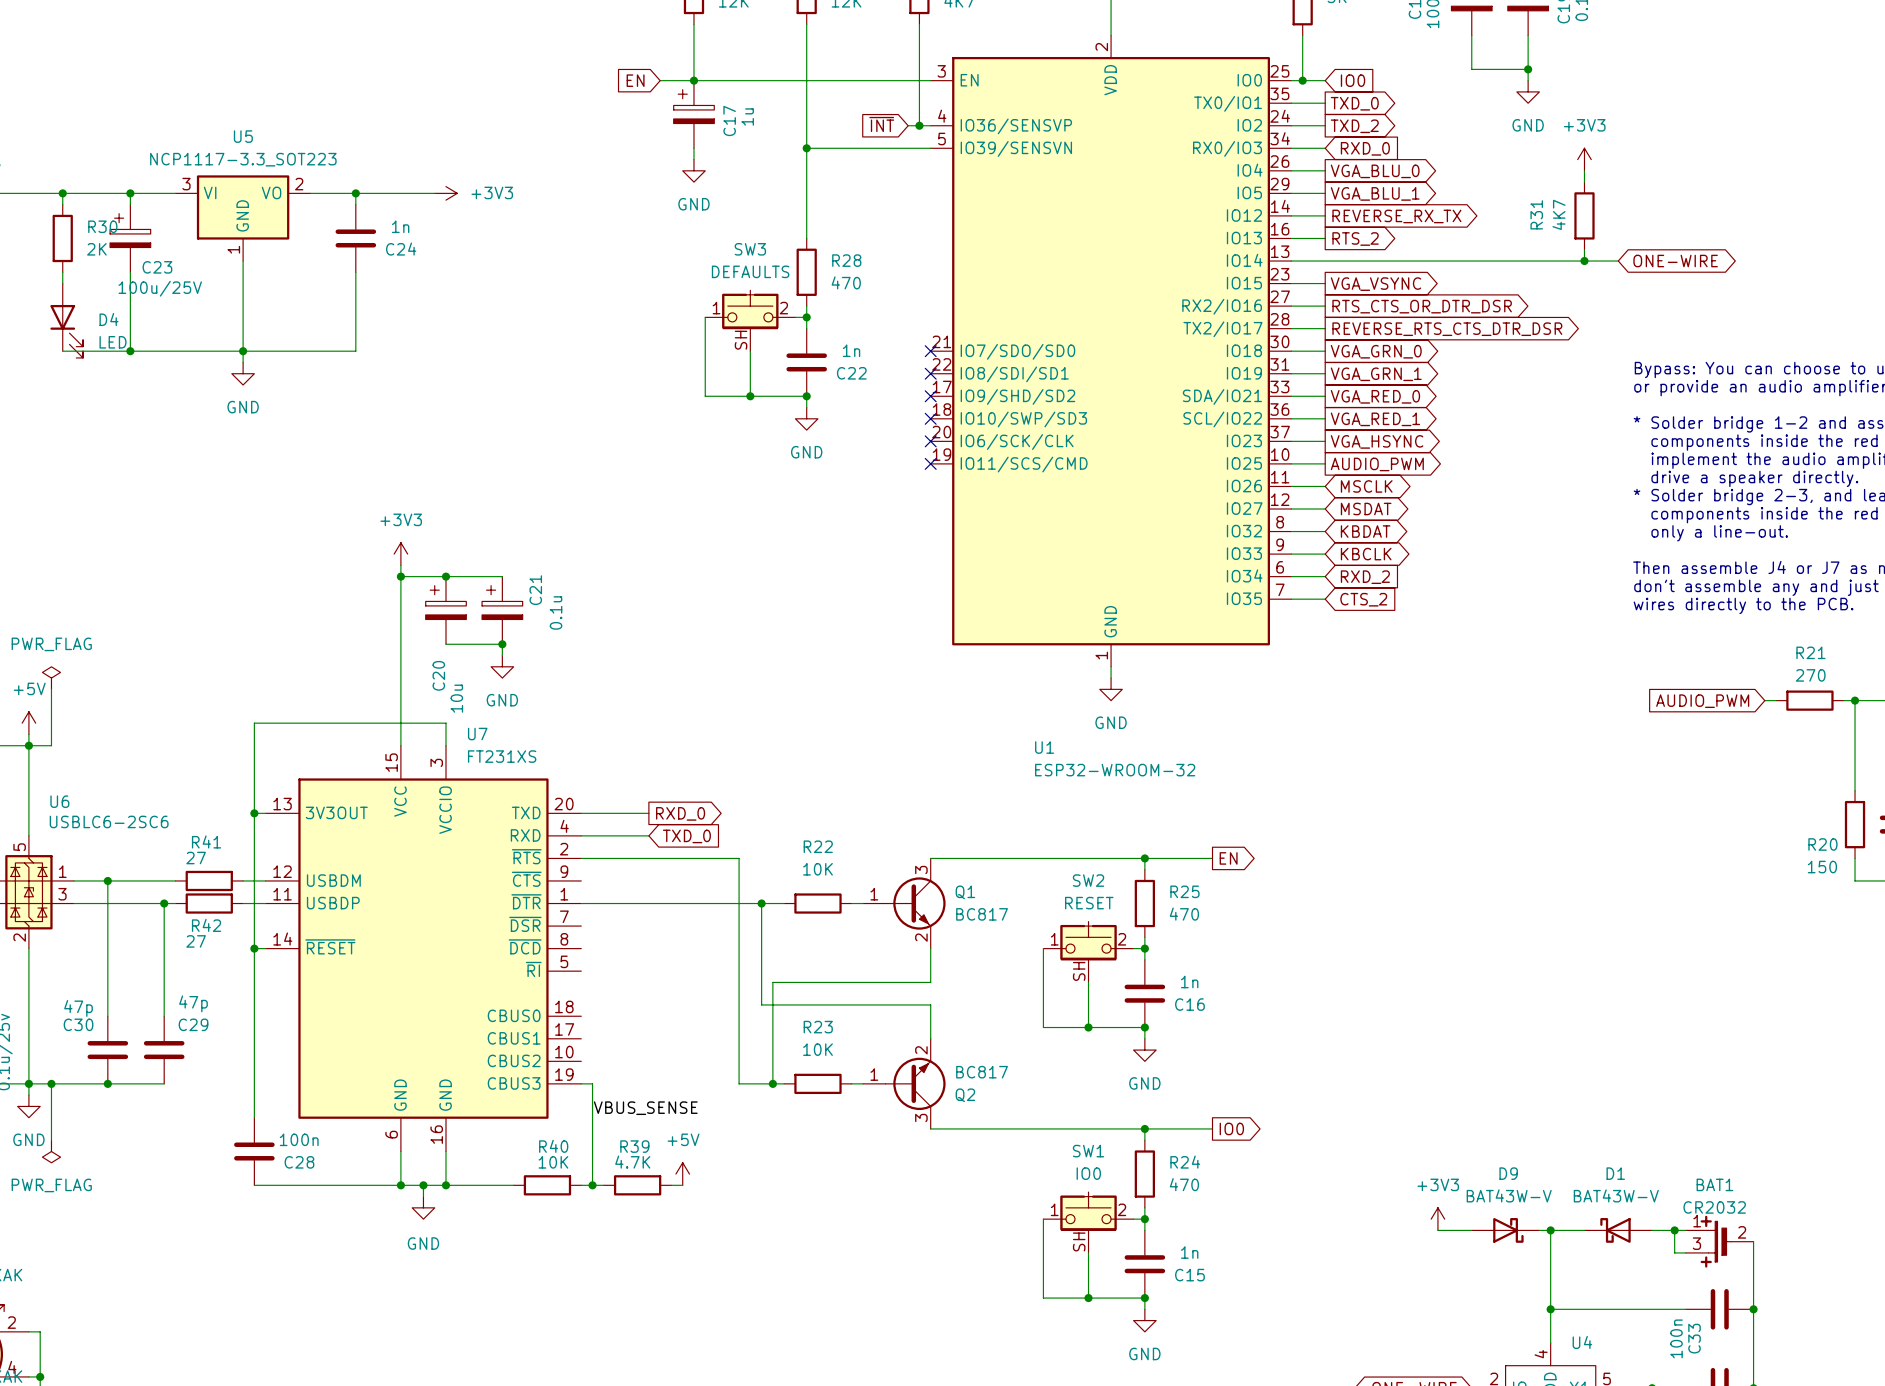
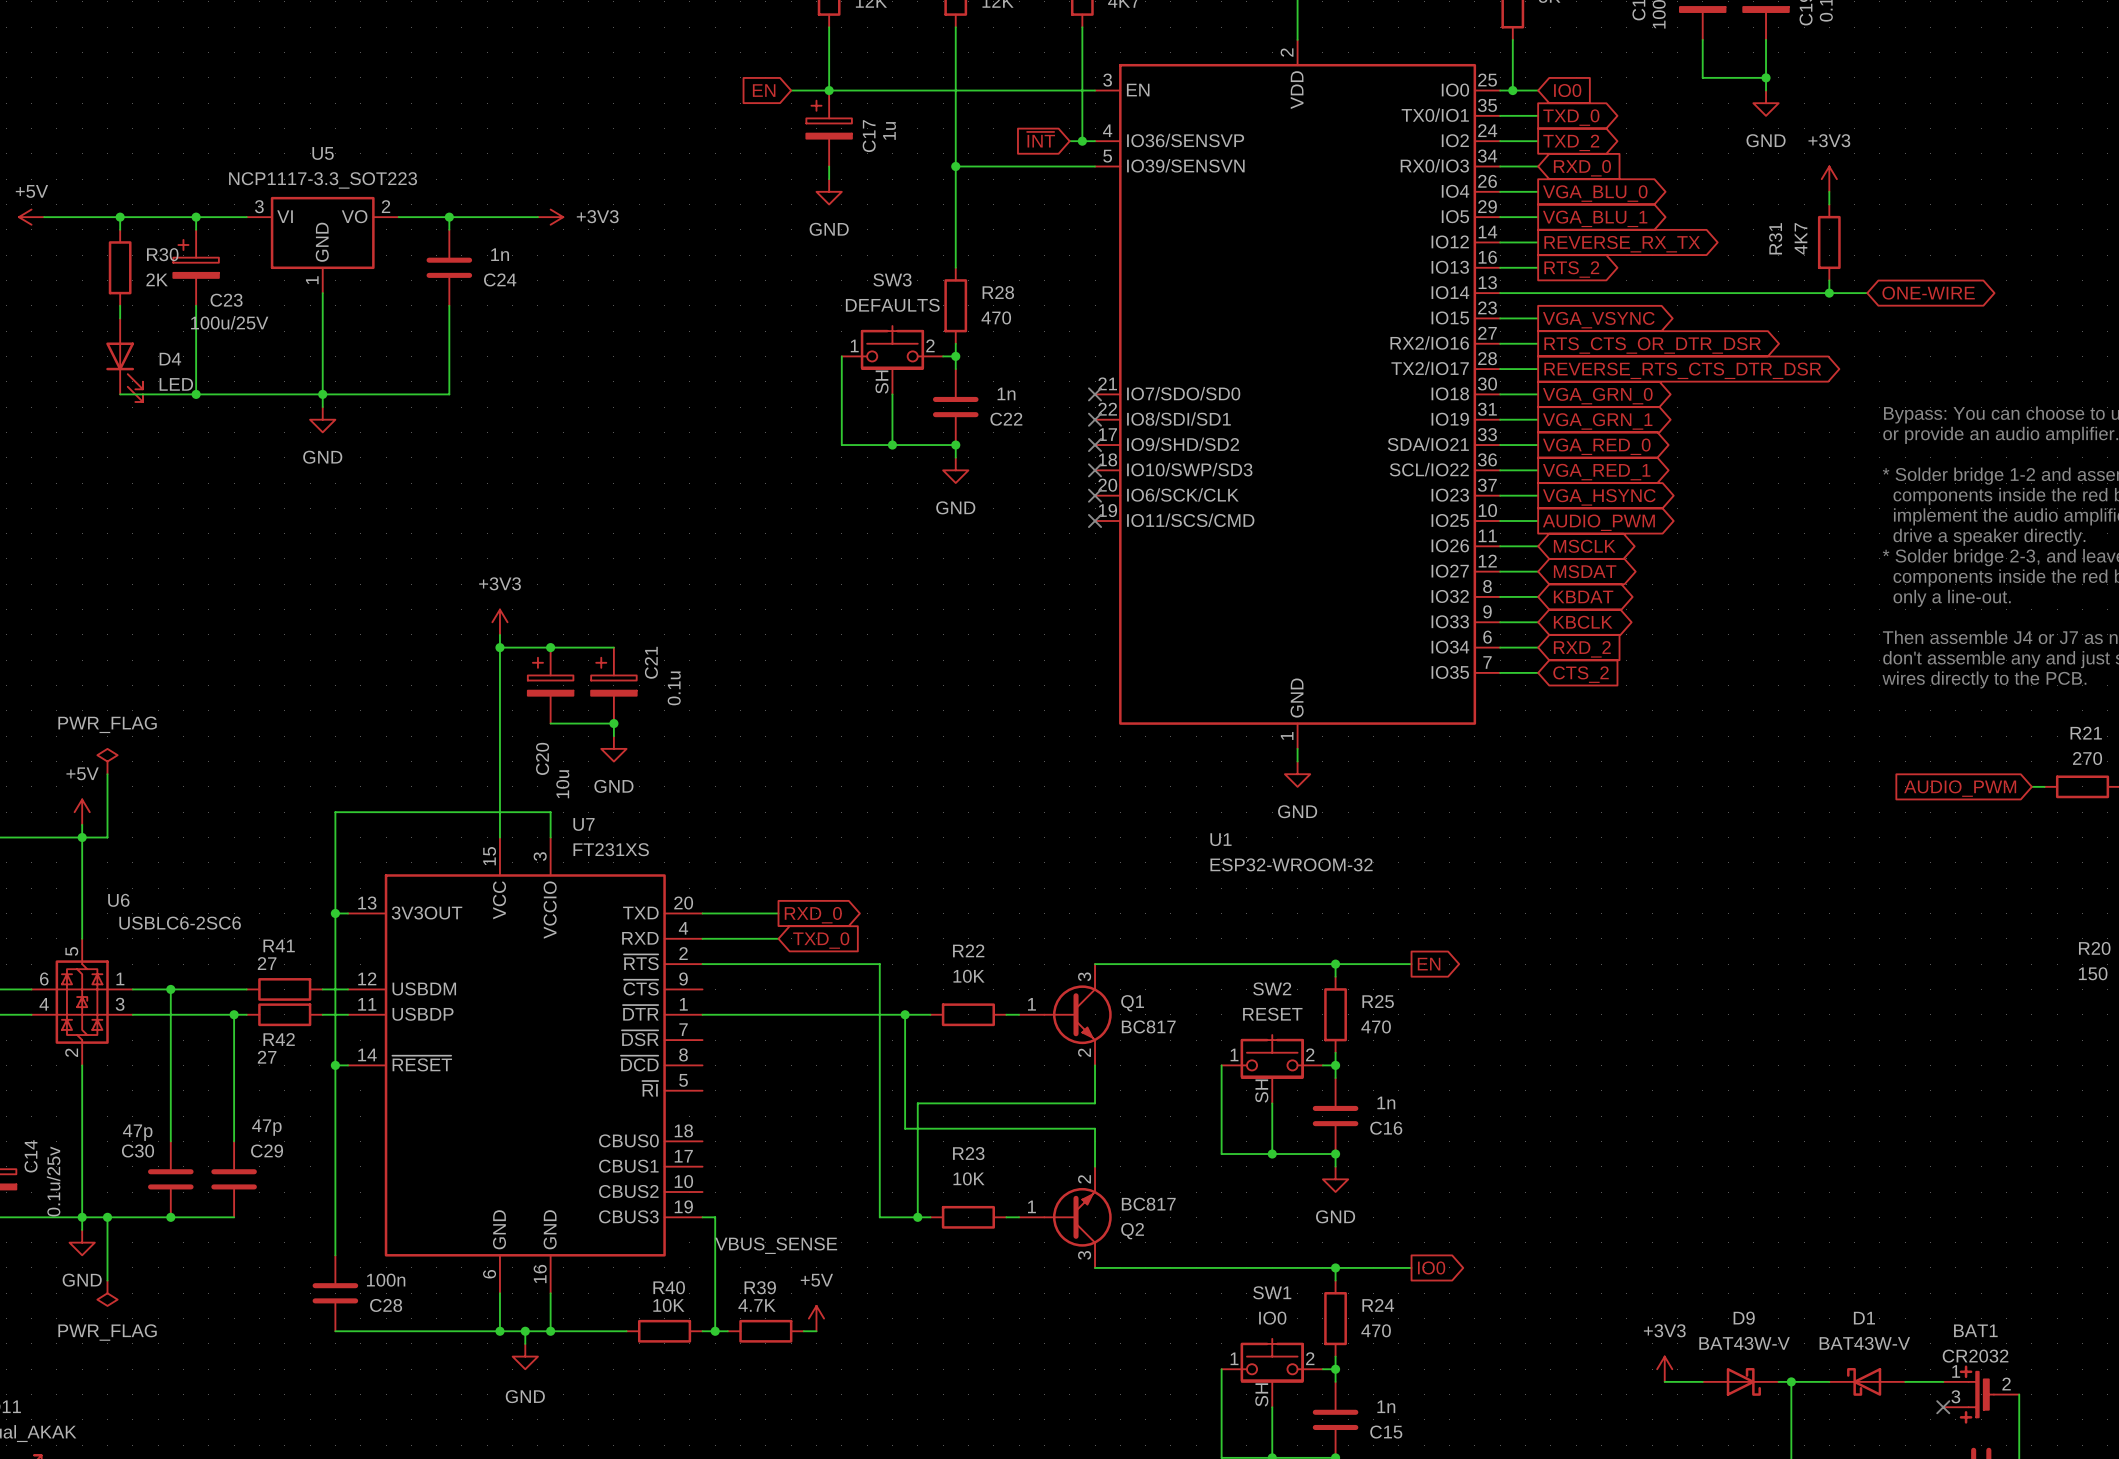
wire: (1674, 1230) (1674, 1252) (1685, 1252) -> none
junction: (1674, 1230) -> none
no-connect mark: none -> (1943, 1407)

